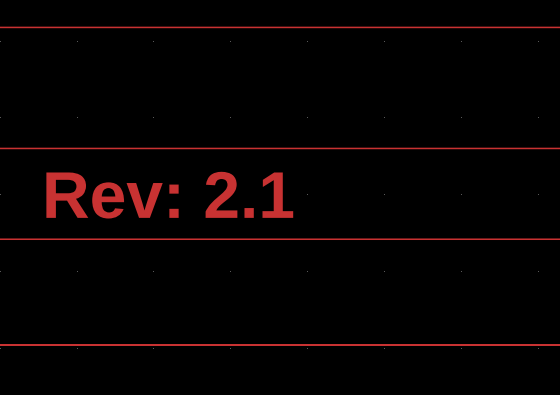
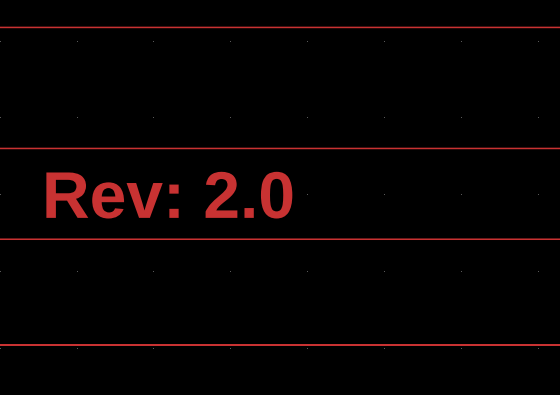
title block: Rev: 2.1 (169, 195) -> Rev: 2.0 (169, 195)

